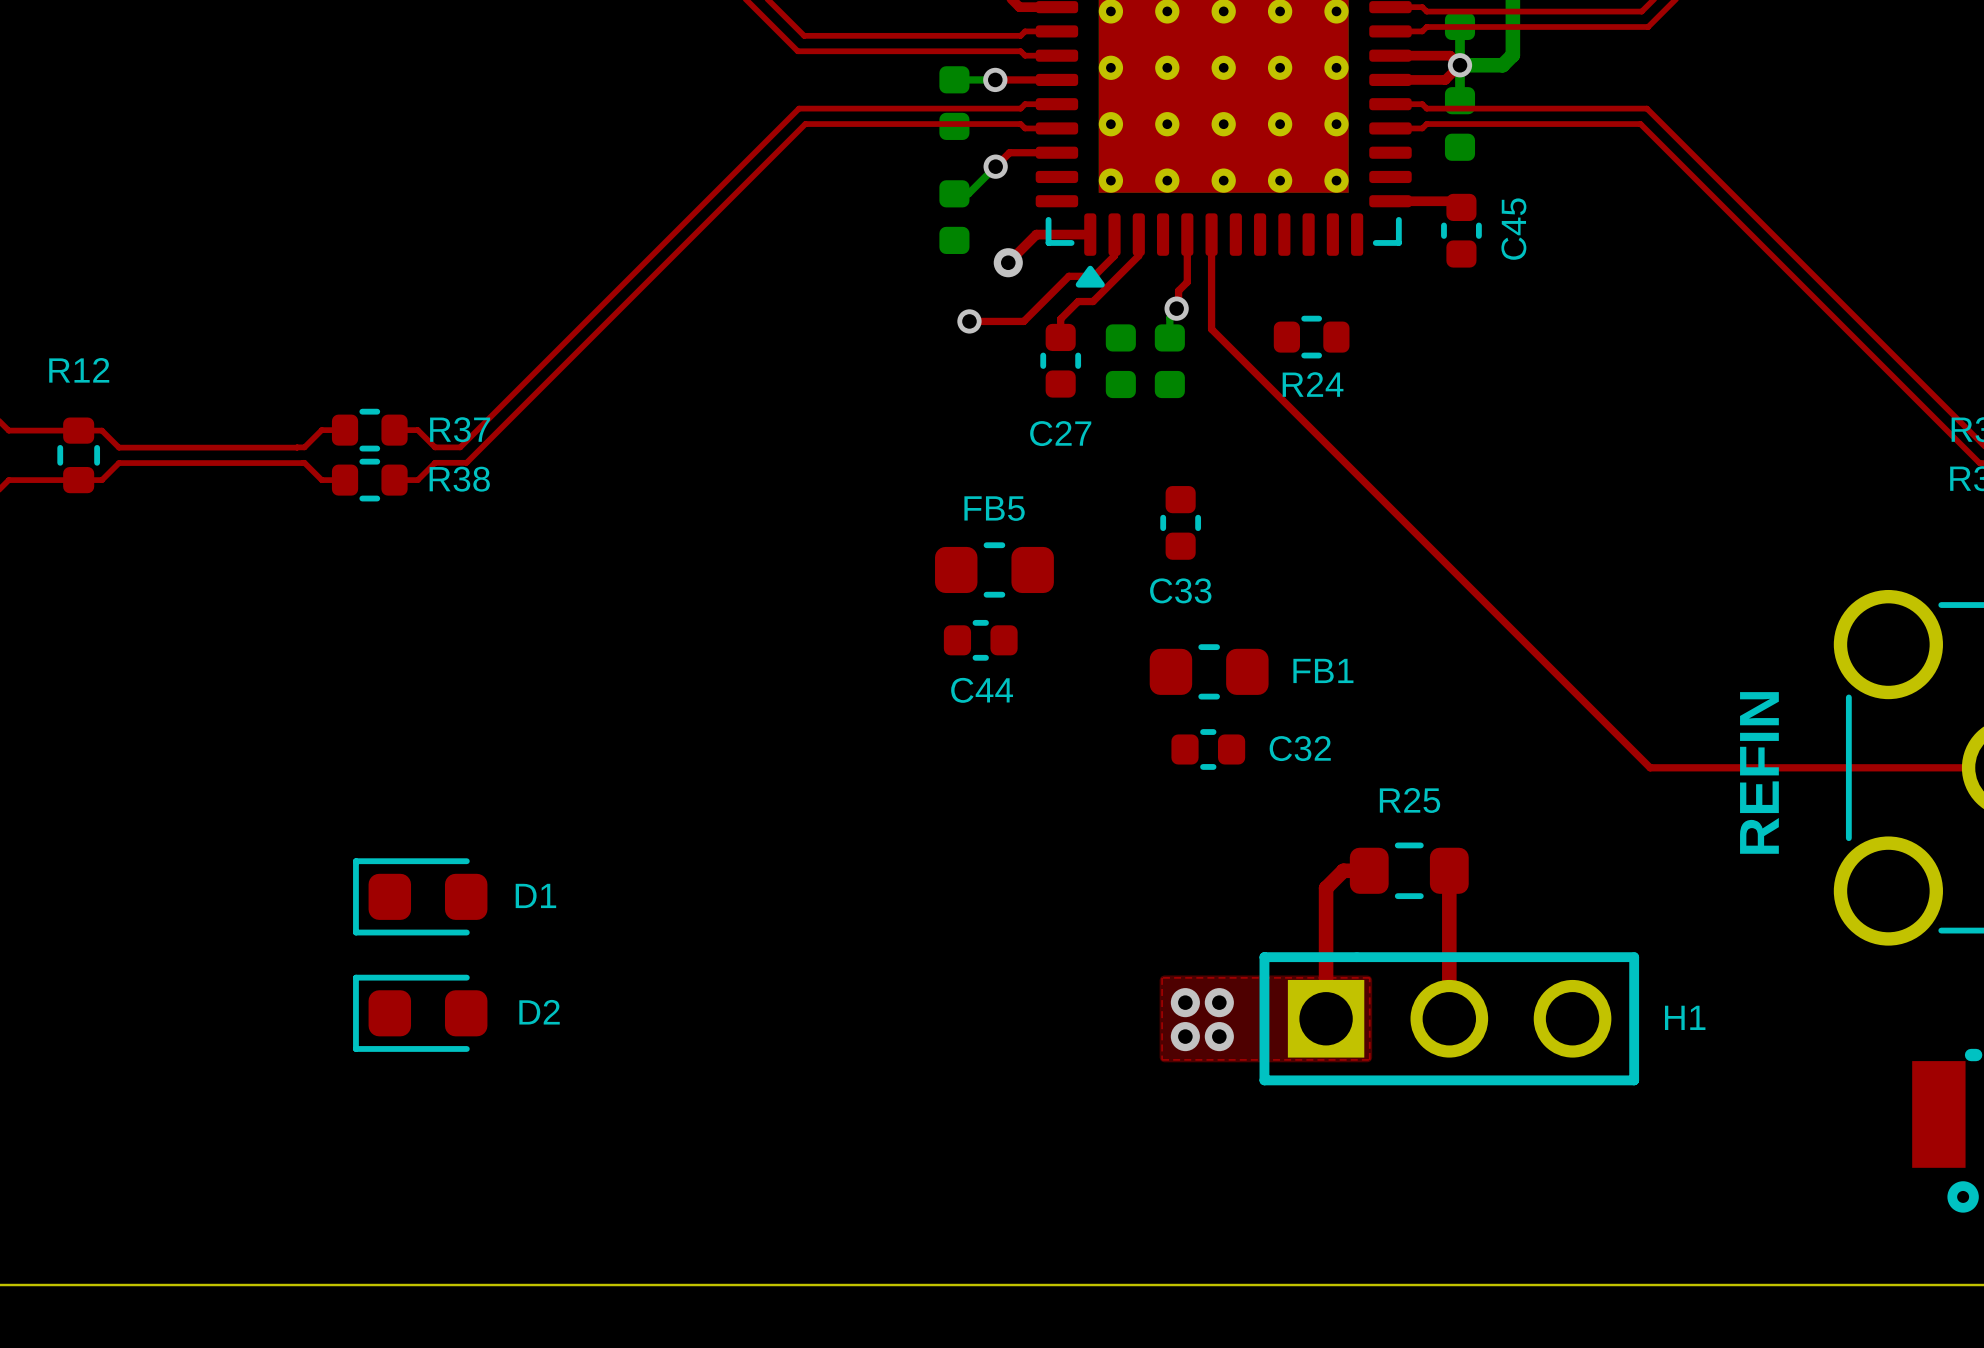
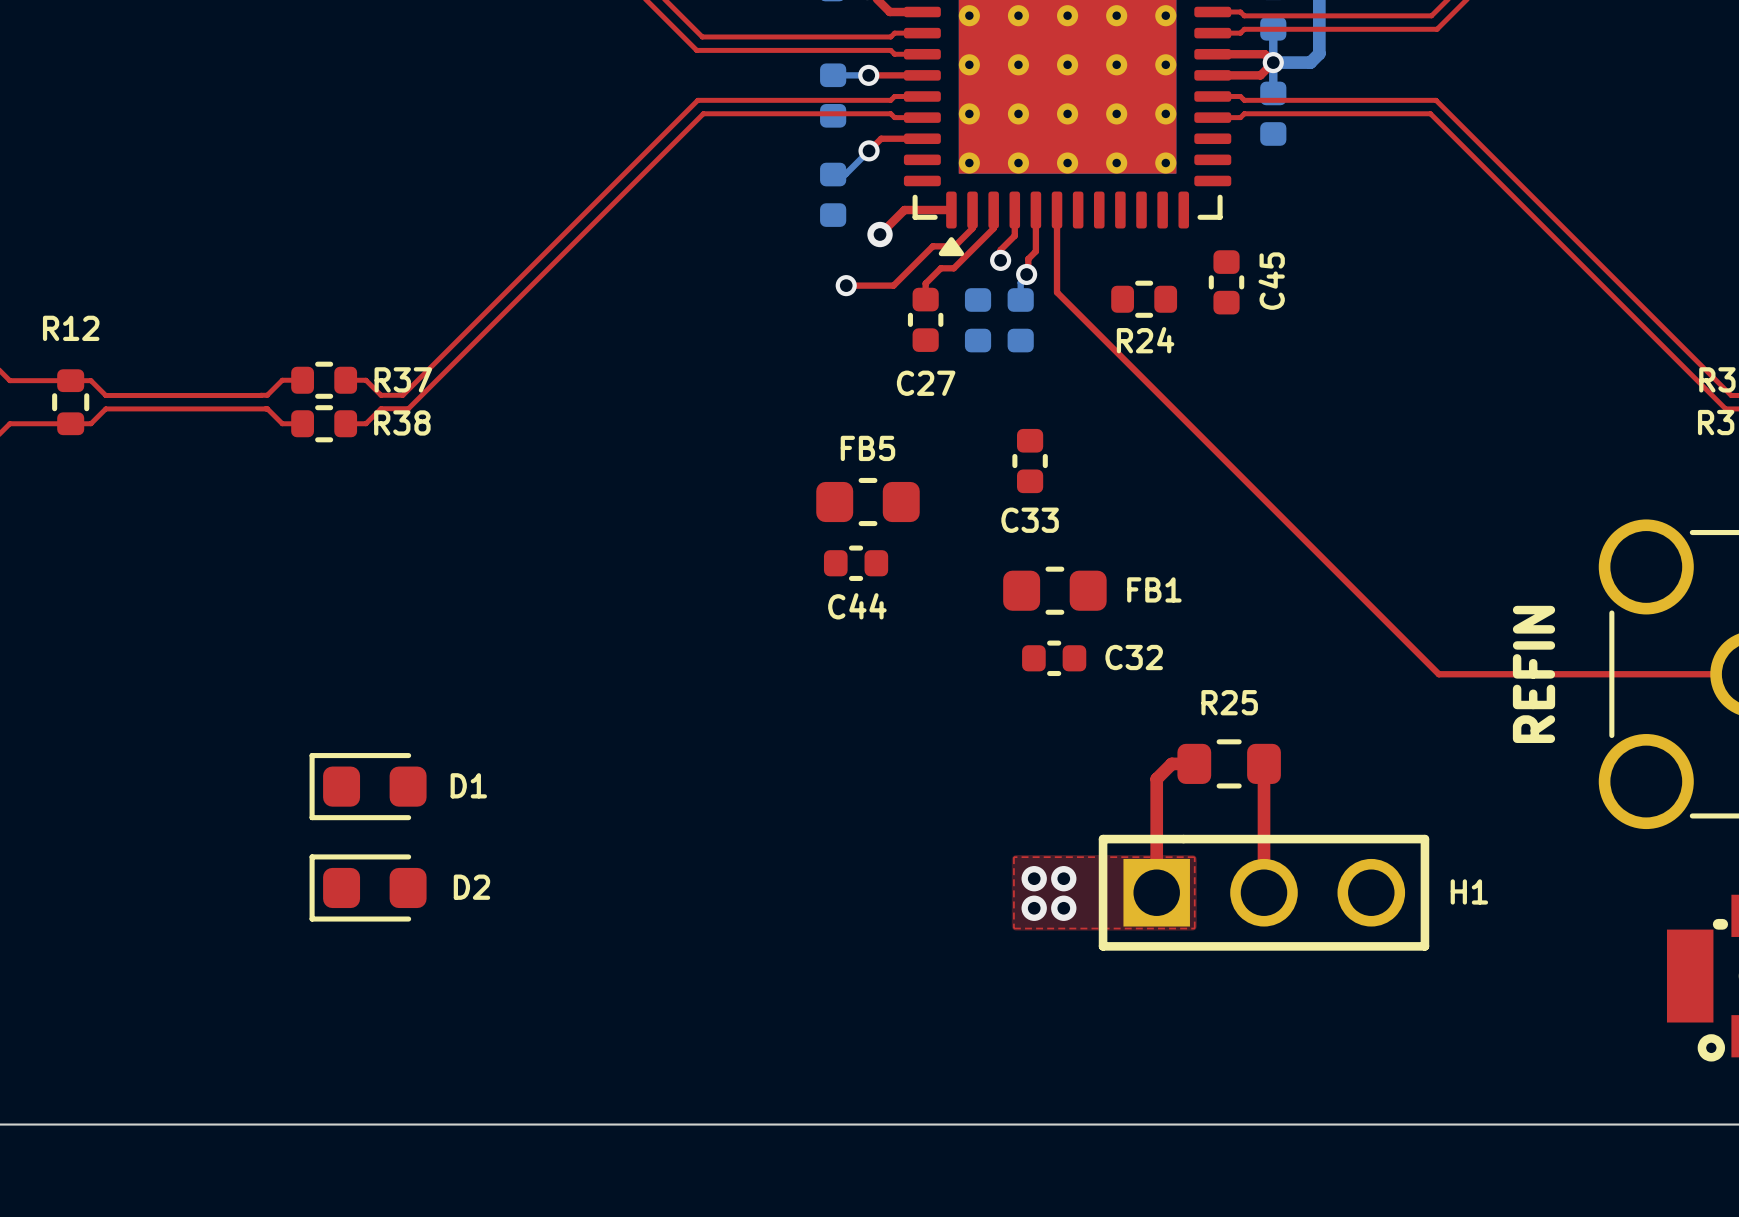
top track: (1390, 201) (1455, 201) (1461, 207) -> none
C45 position: (1461, 230) -> (1226, 282)
top track: none -> (1014, 210) (1014, 235) (1000, 249) (1000, 260)
via: none -> (1000, 260)

